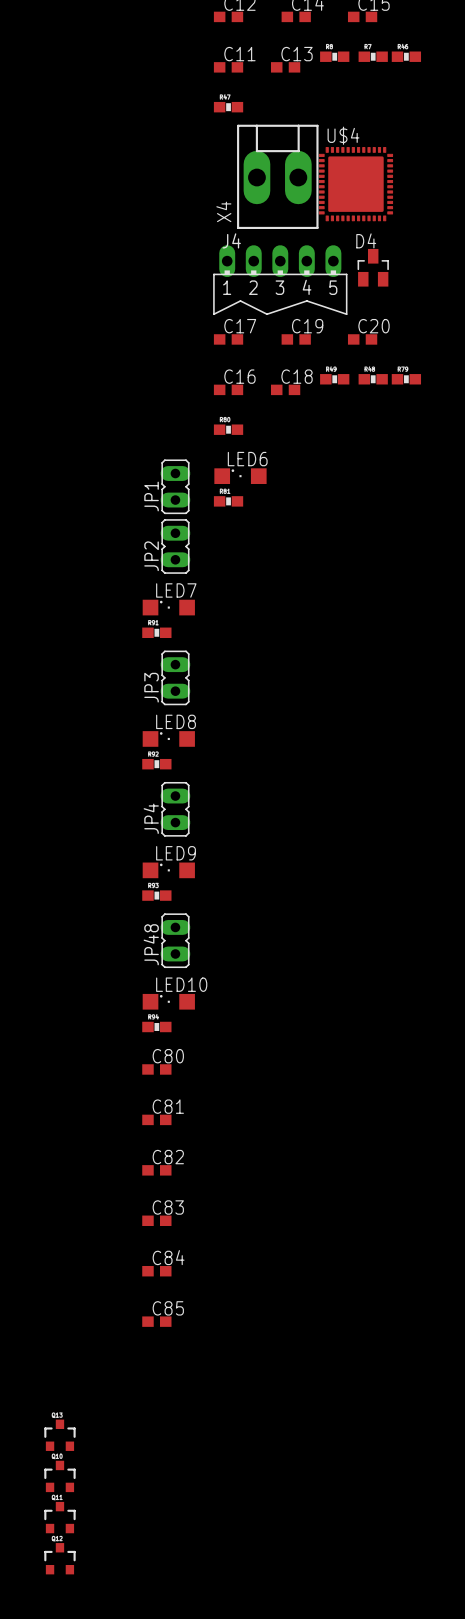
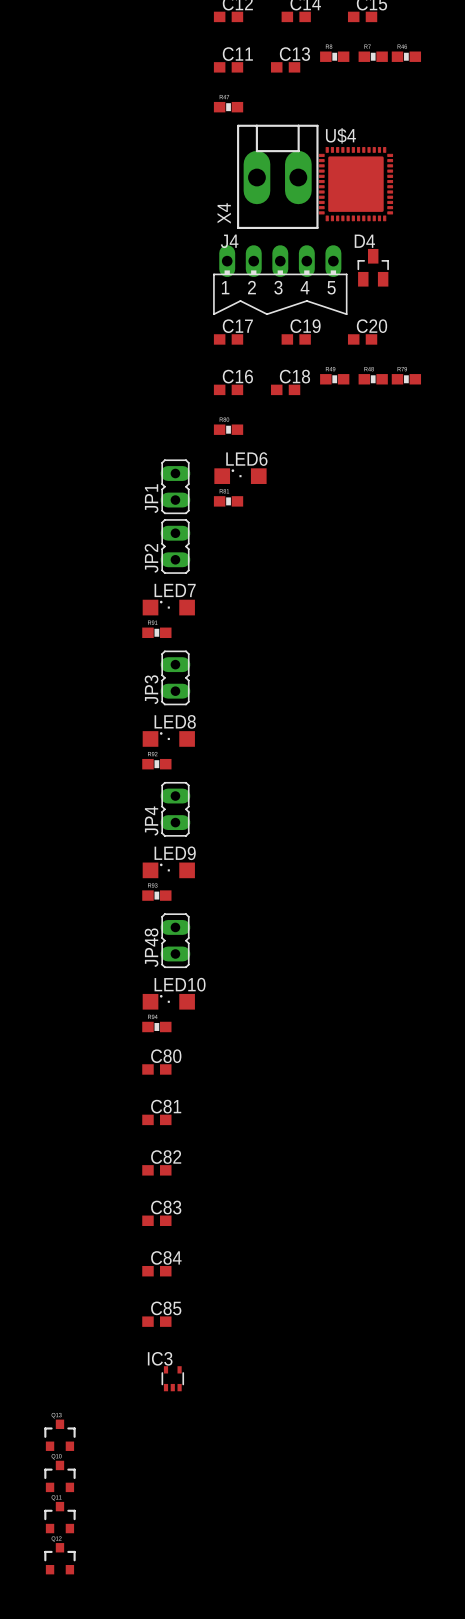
IC3: none -> (172, 1378)

